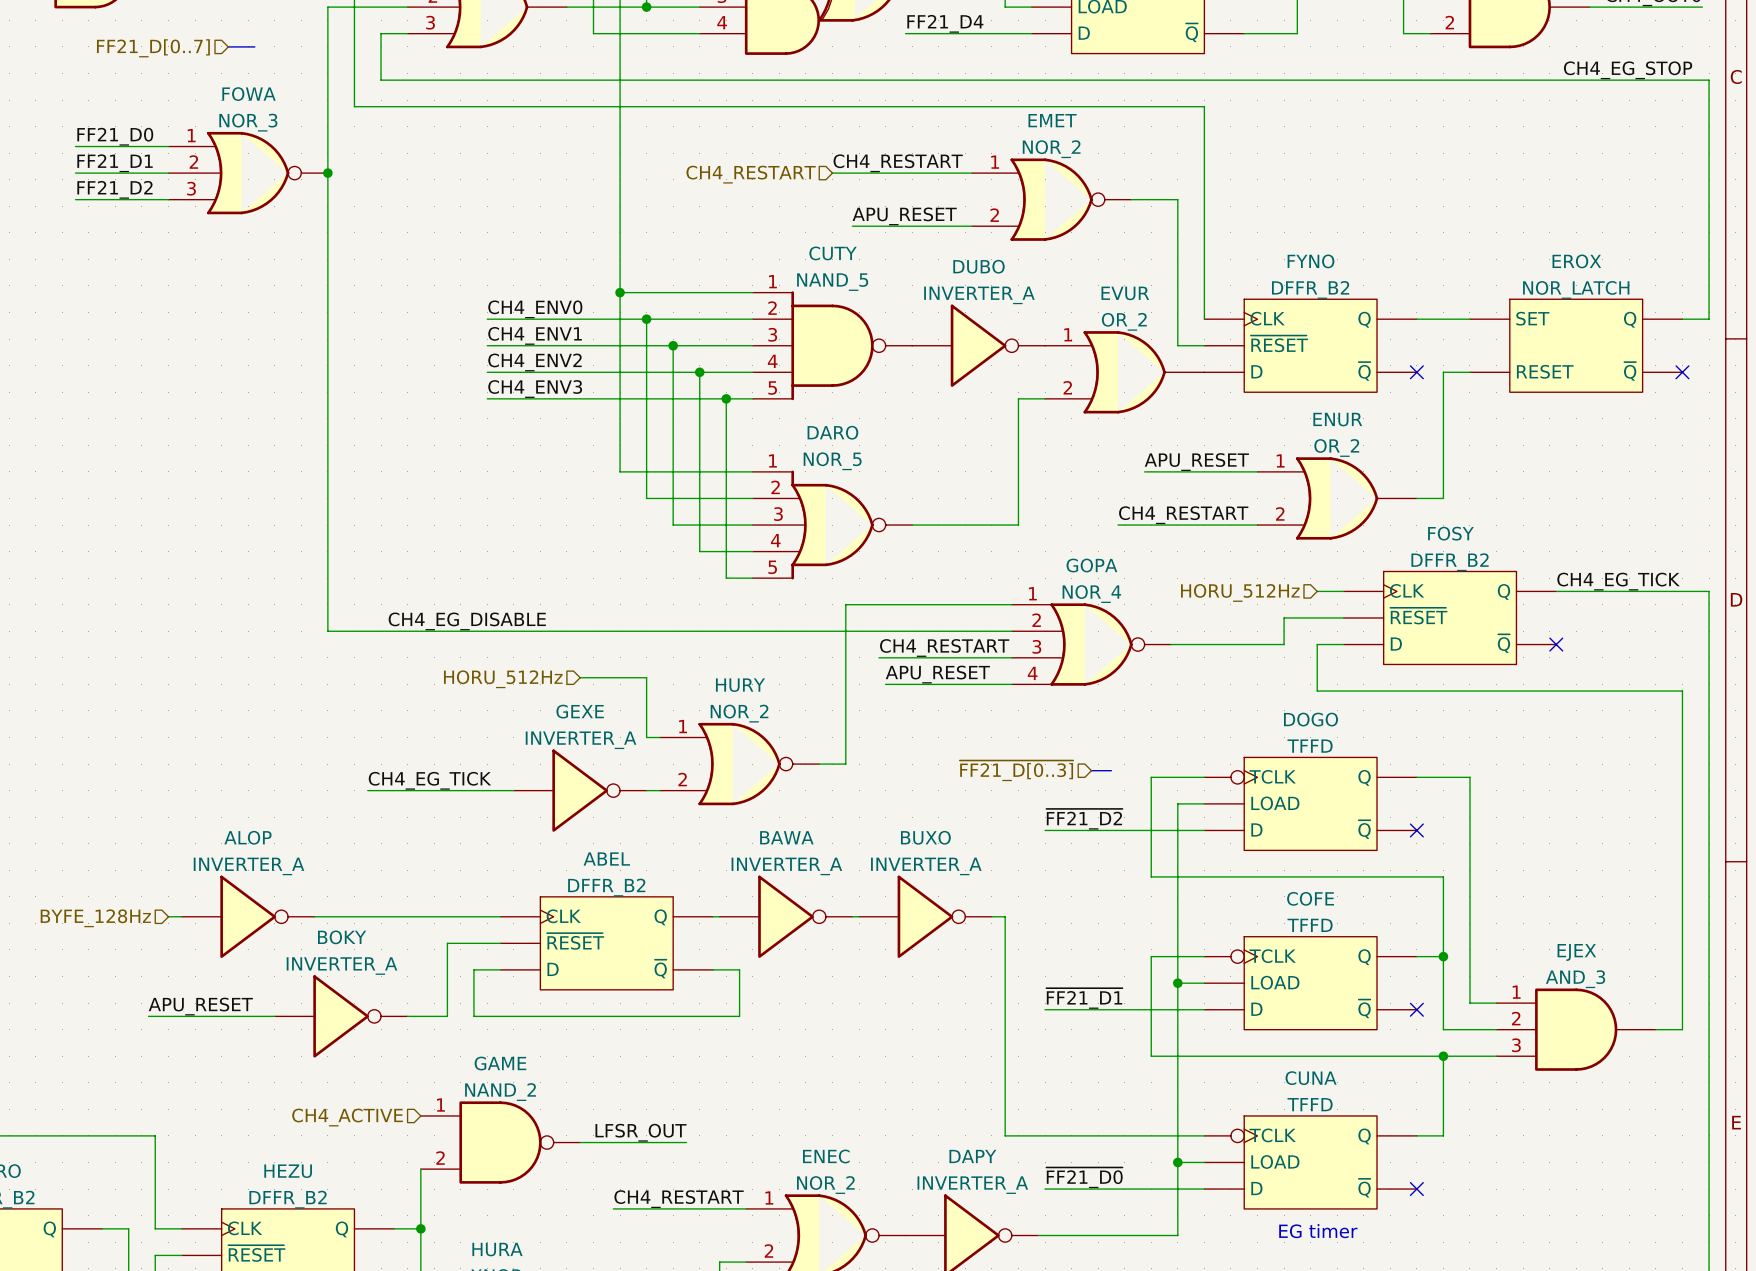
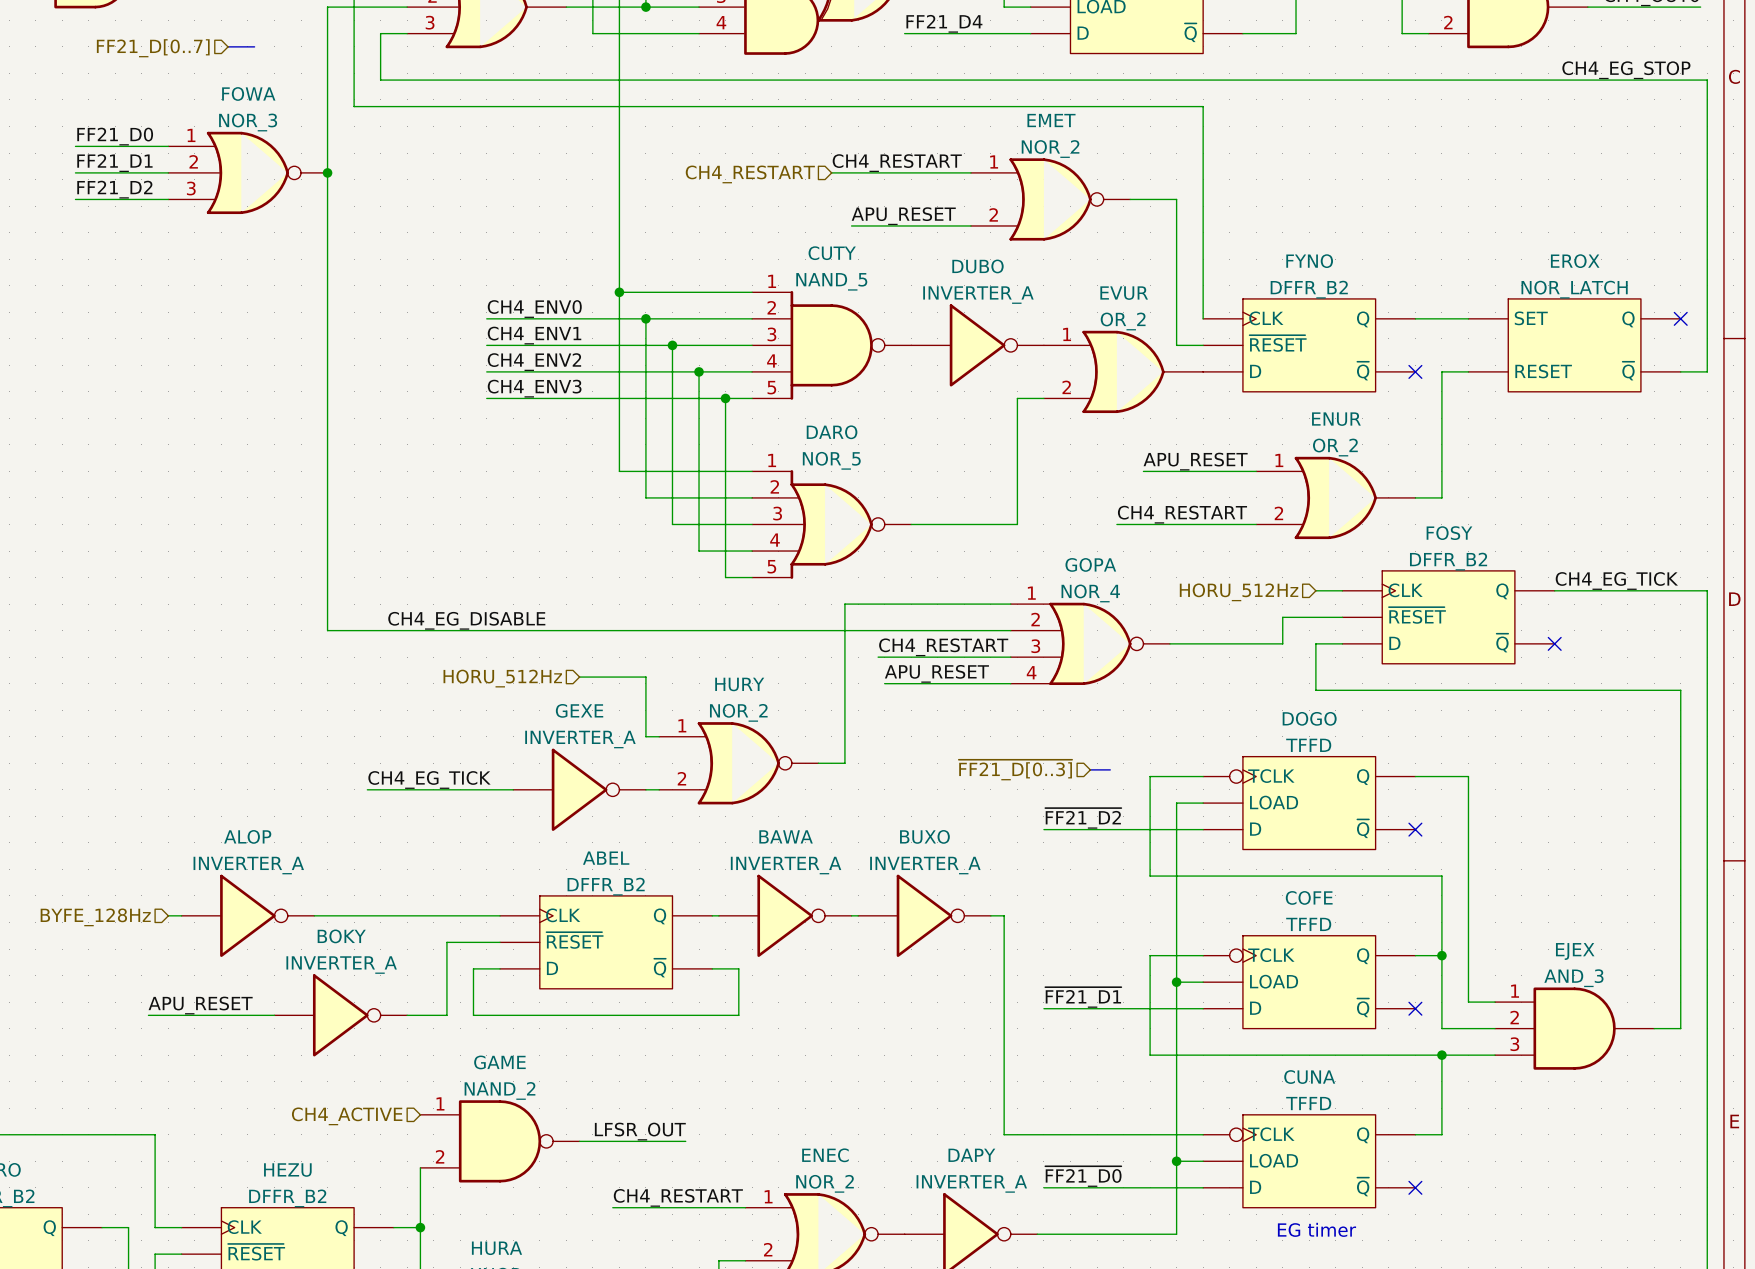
wire: (1682, 319) (1709, 319) -> (1680, 371) (1707, 371) (1707, 318)
no-connect mark position: (1682, 372) -> (1680, 318)

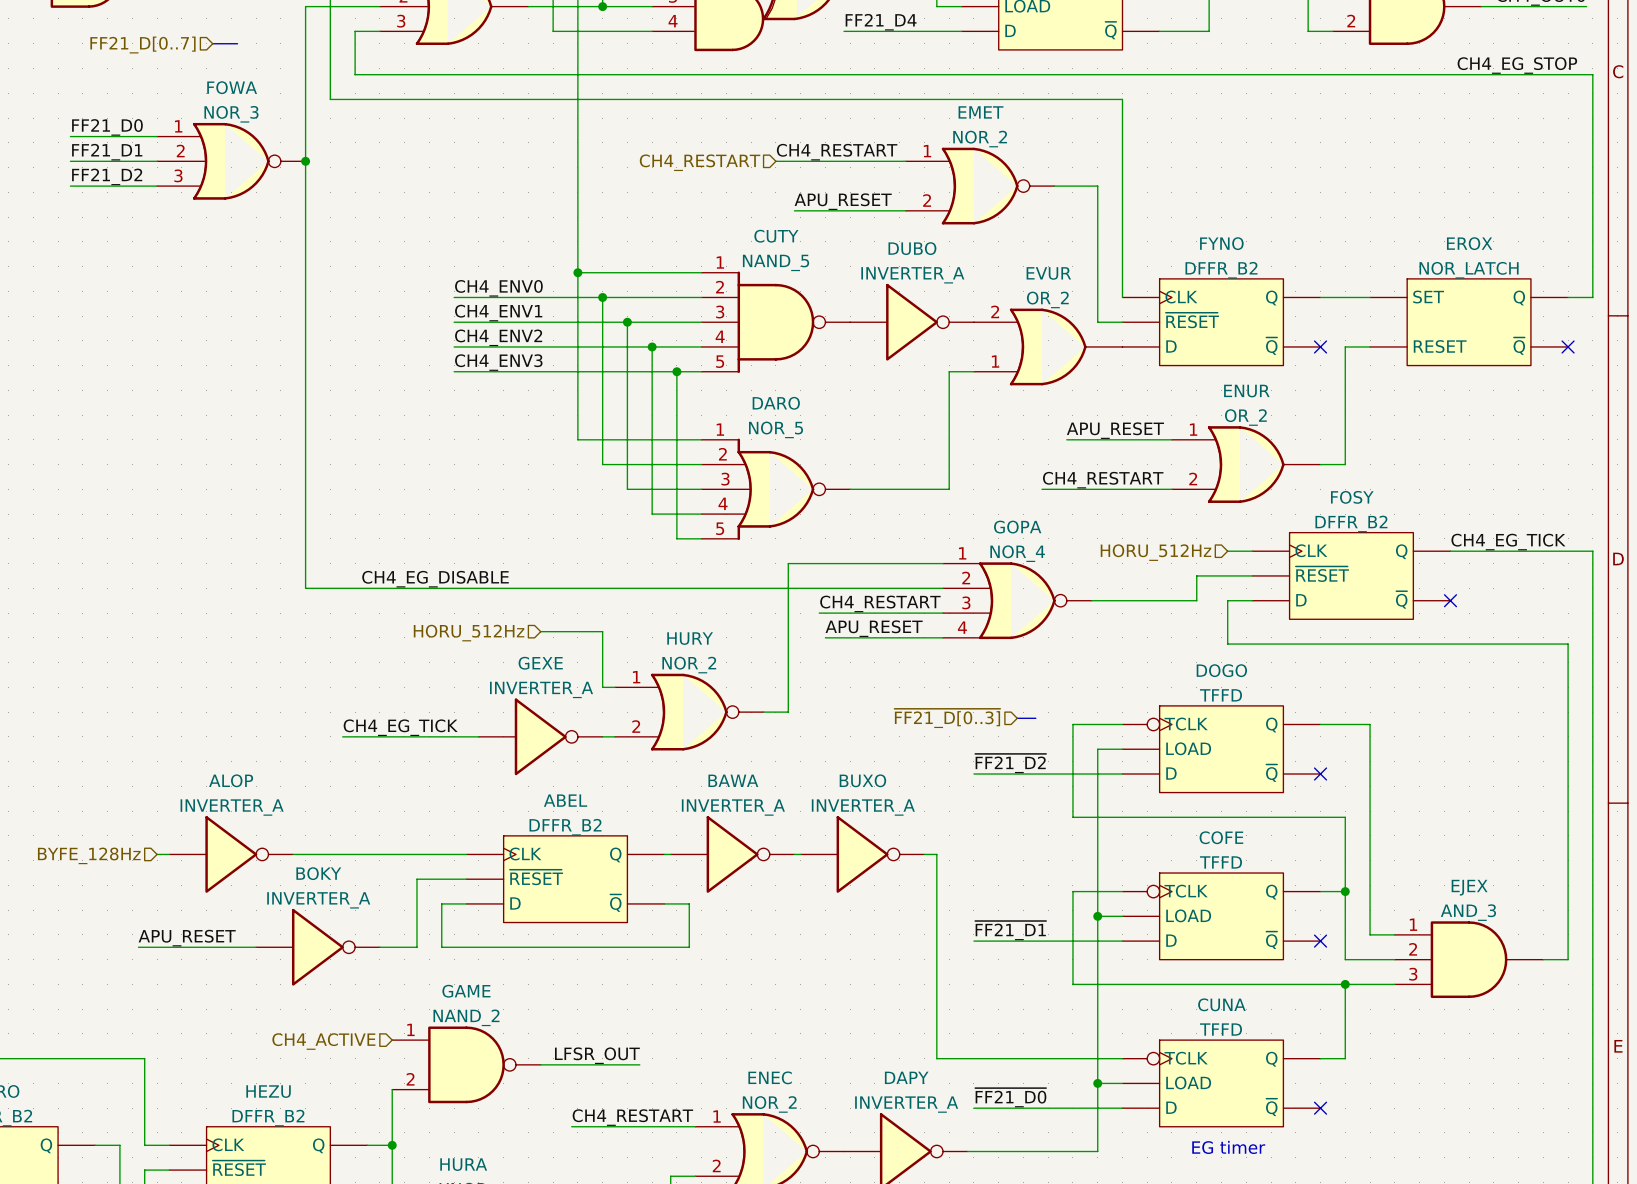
no-connect mark position: (1680, 318) -> (1568, 346)
wire: (1707, 318) (1707, 371) (1680, 371) -> (1592, 297) (1568, 297)
EVUR flip: as is (1123, 371) -> up-down (1048, 346)

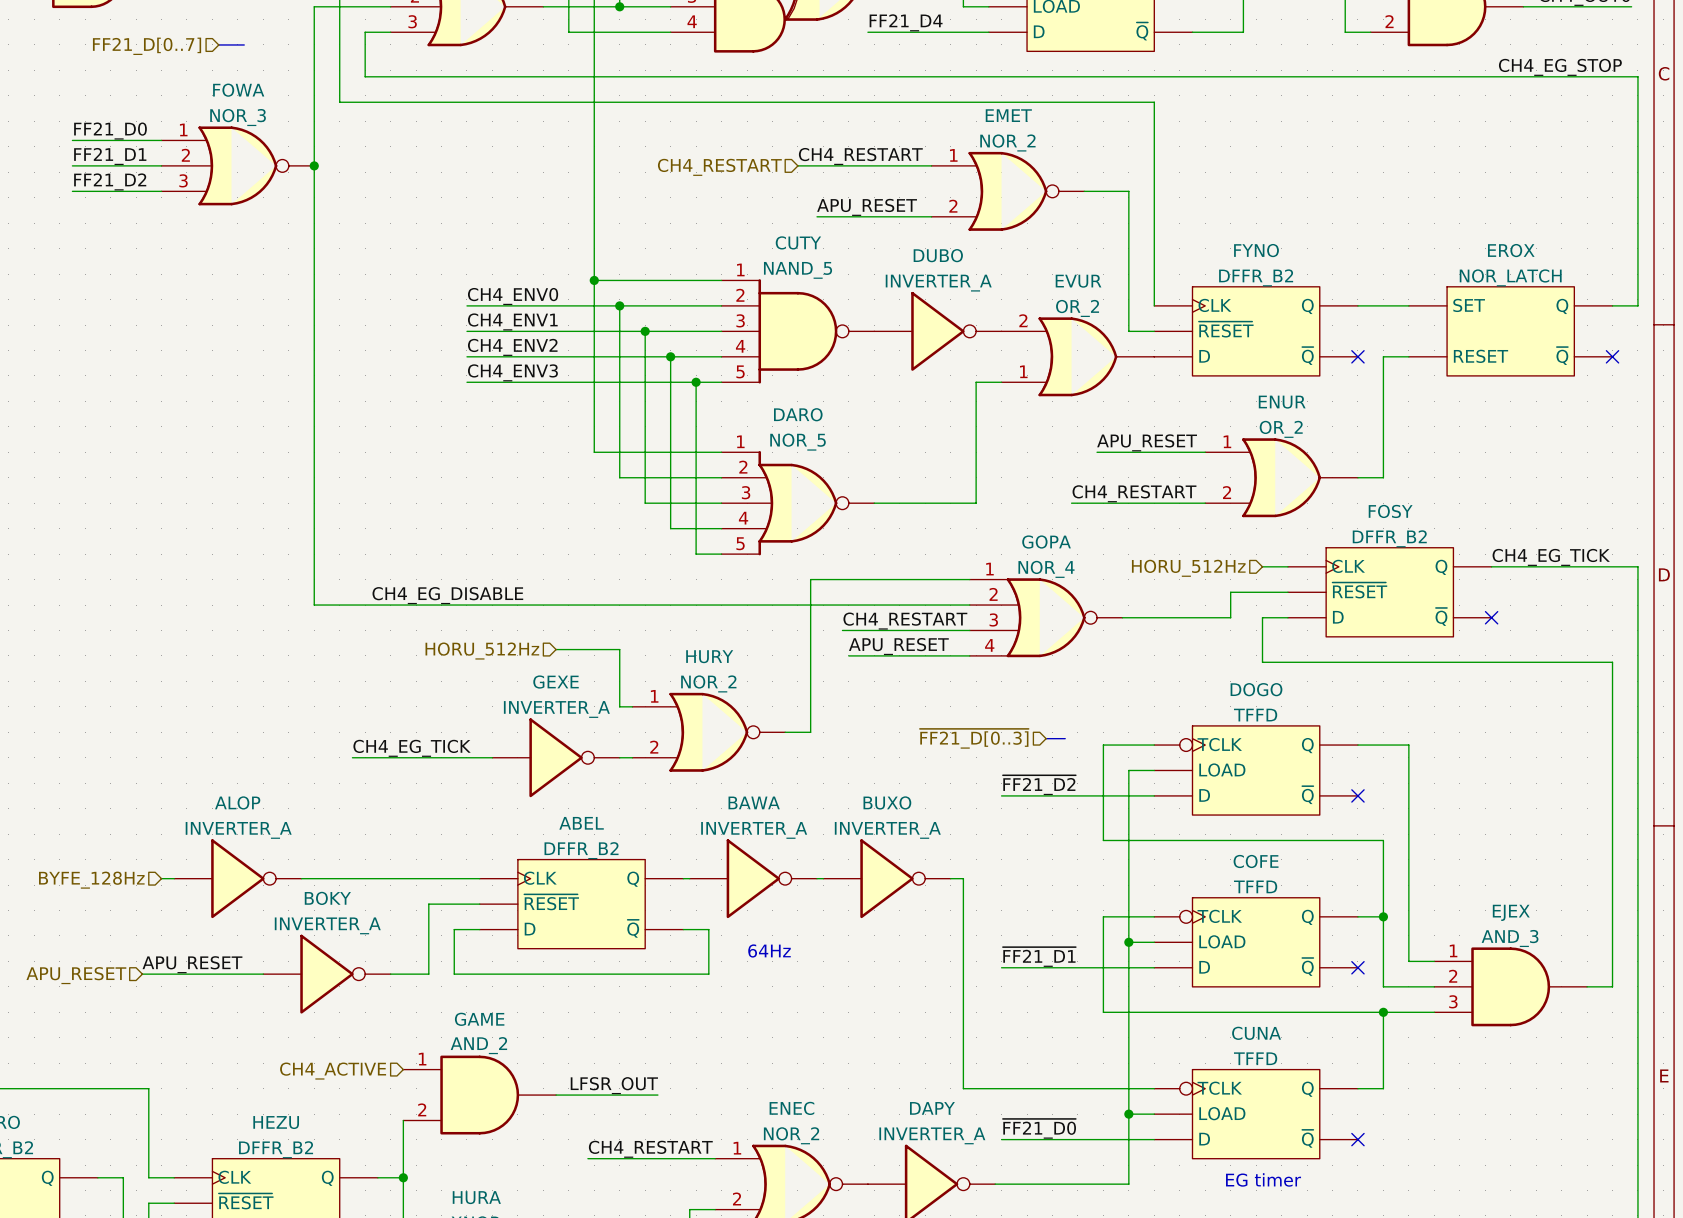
text: none -> 64Hz (769, 950)
hierarchical label: none -> APU_RESET (76, 975)
GAME value: NAND_2 (466, 1017) -> AND_2 (478, 1045)
GAME symbol: [392, 1026, 541, 1104] -> [403, 1055, 557, 1135]

